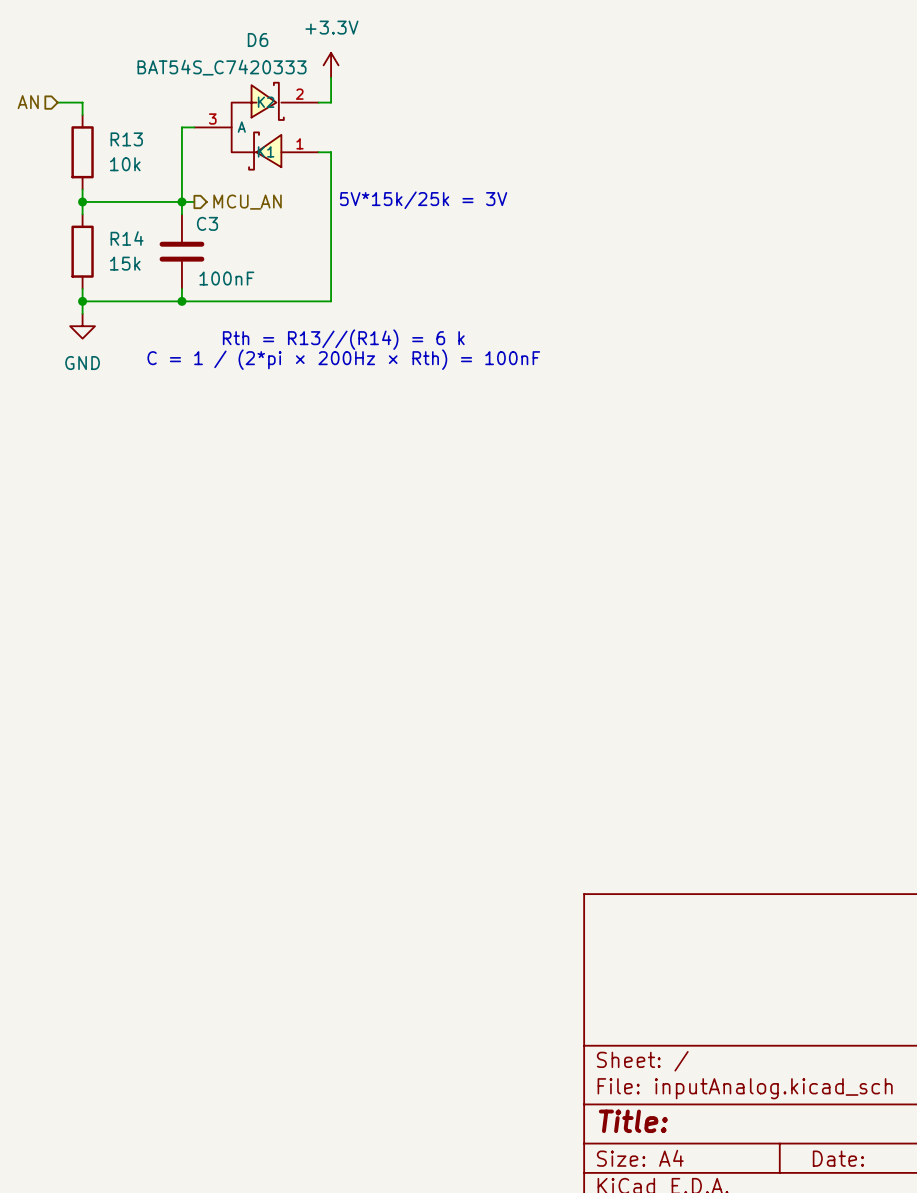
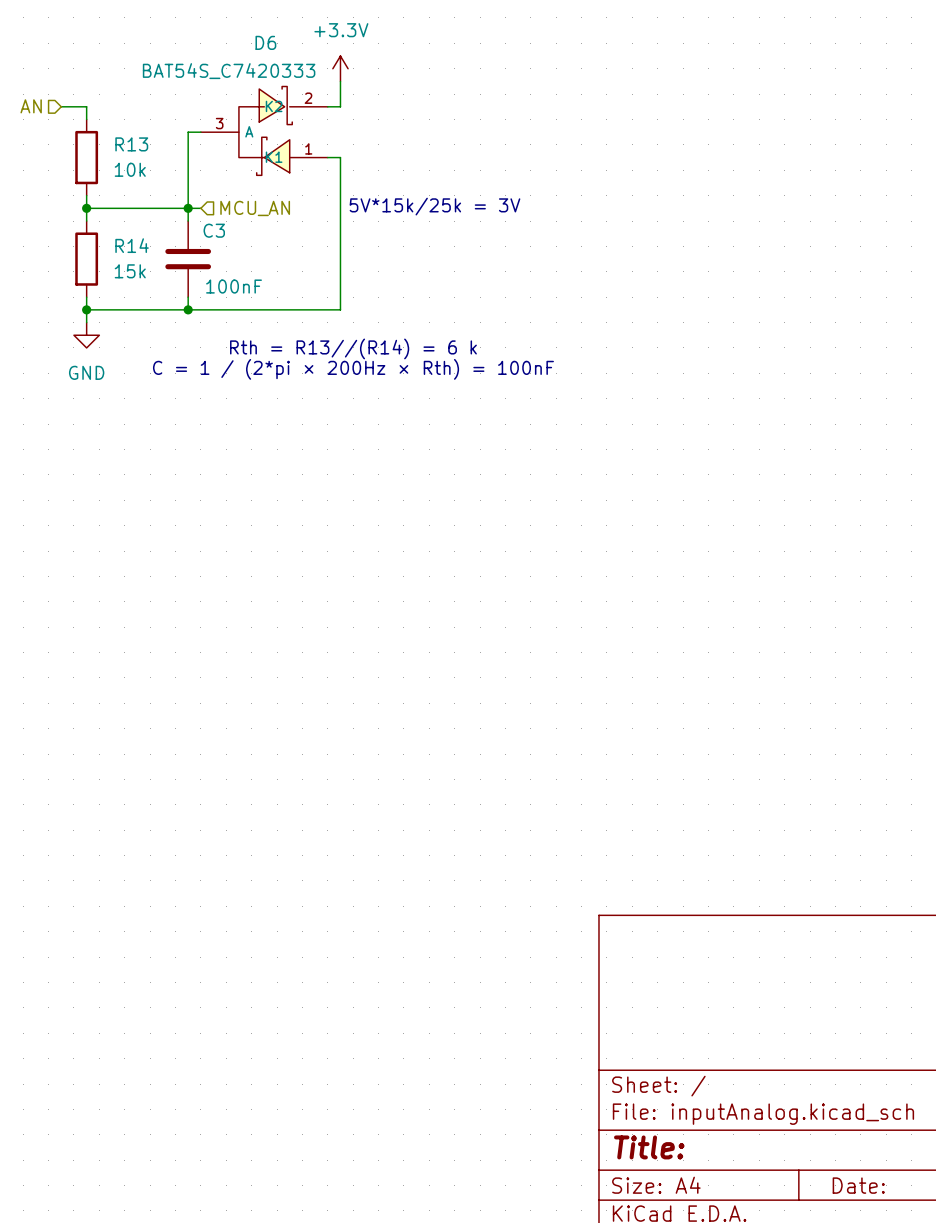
hierarchical label shape: output (247, 202) -> input (255, 208)

